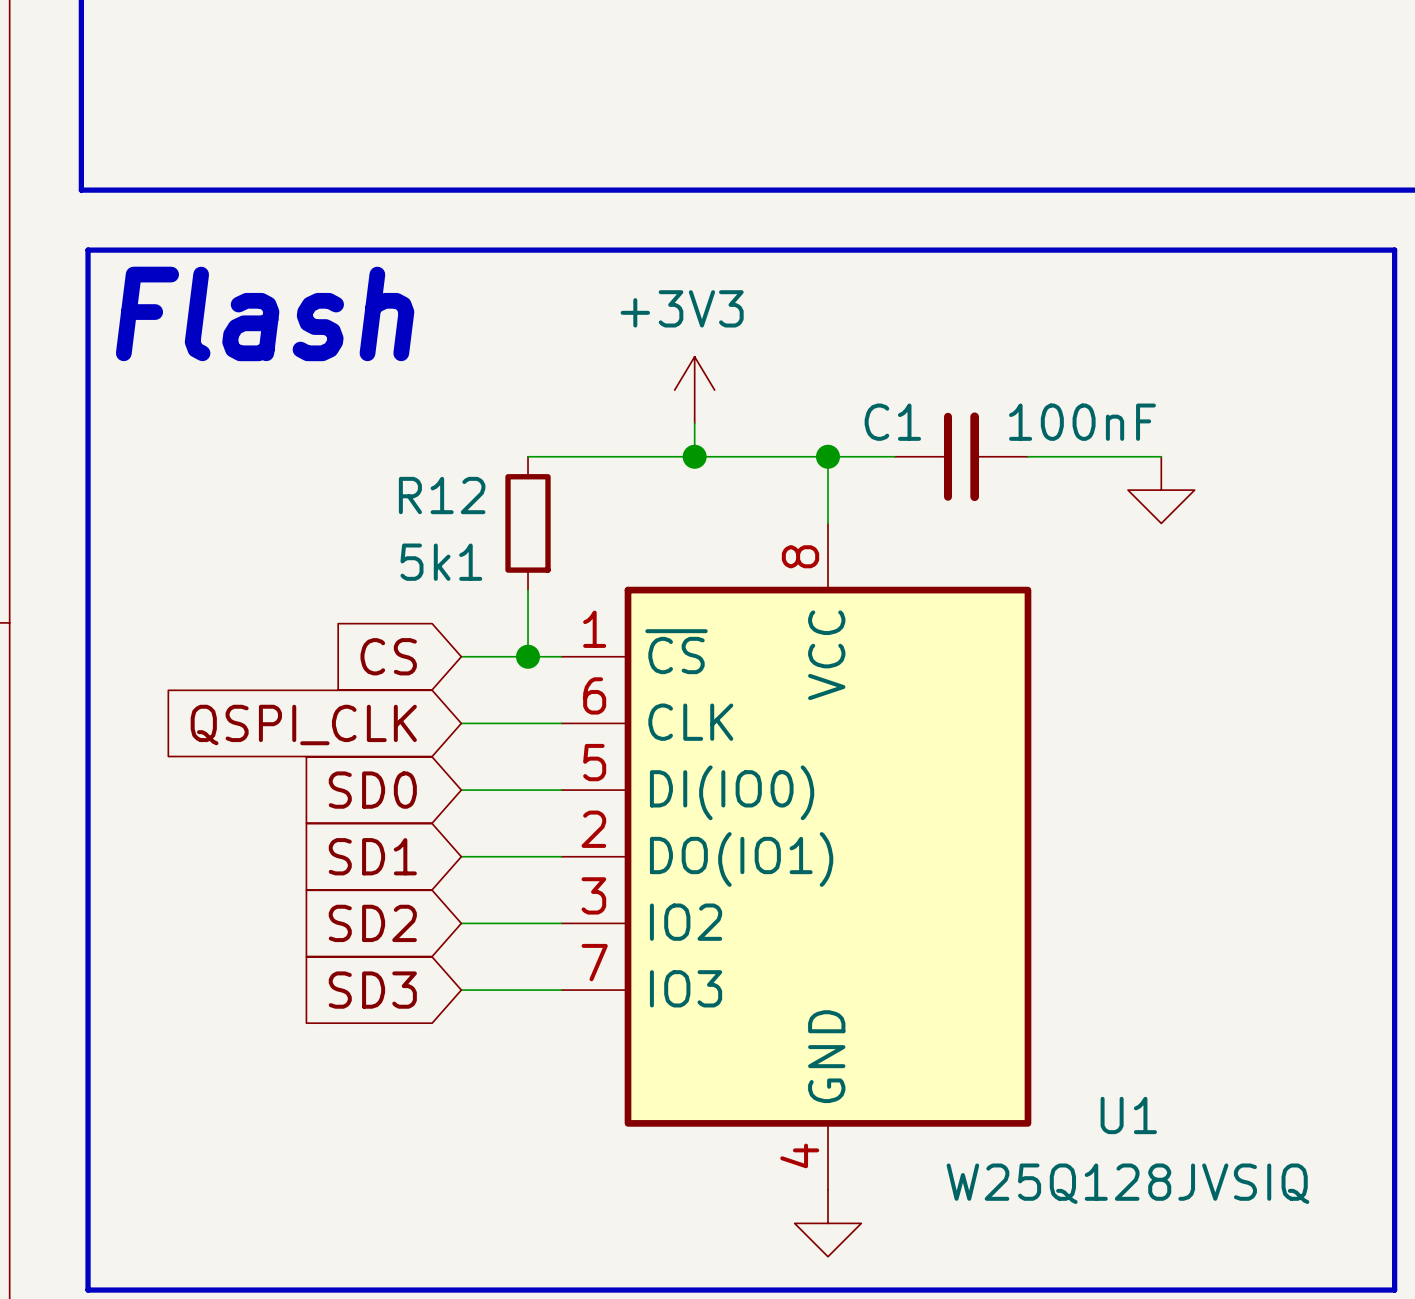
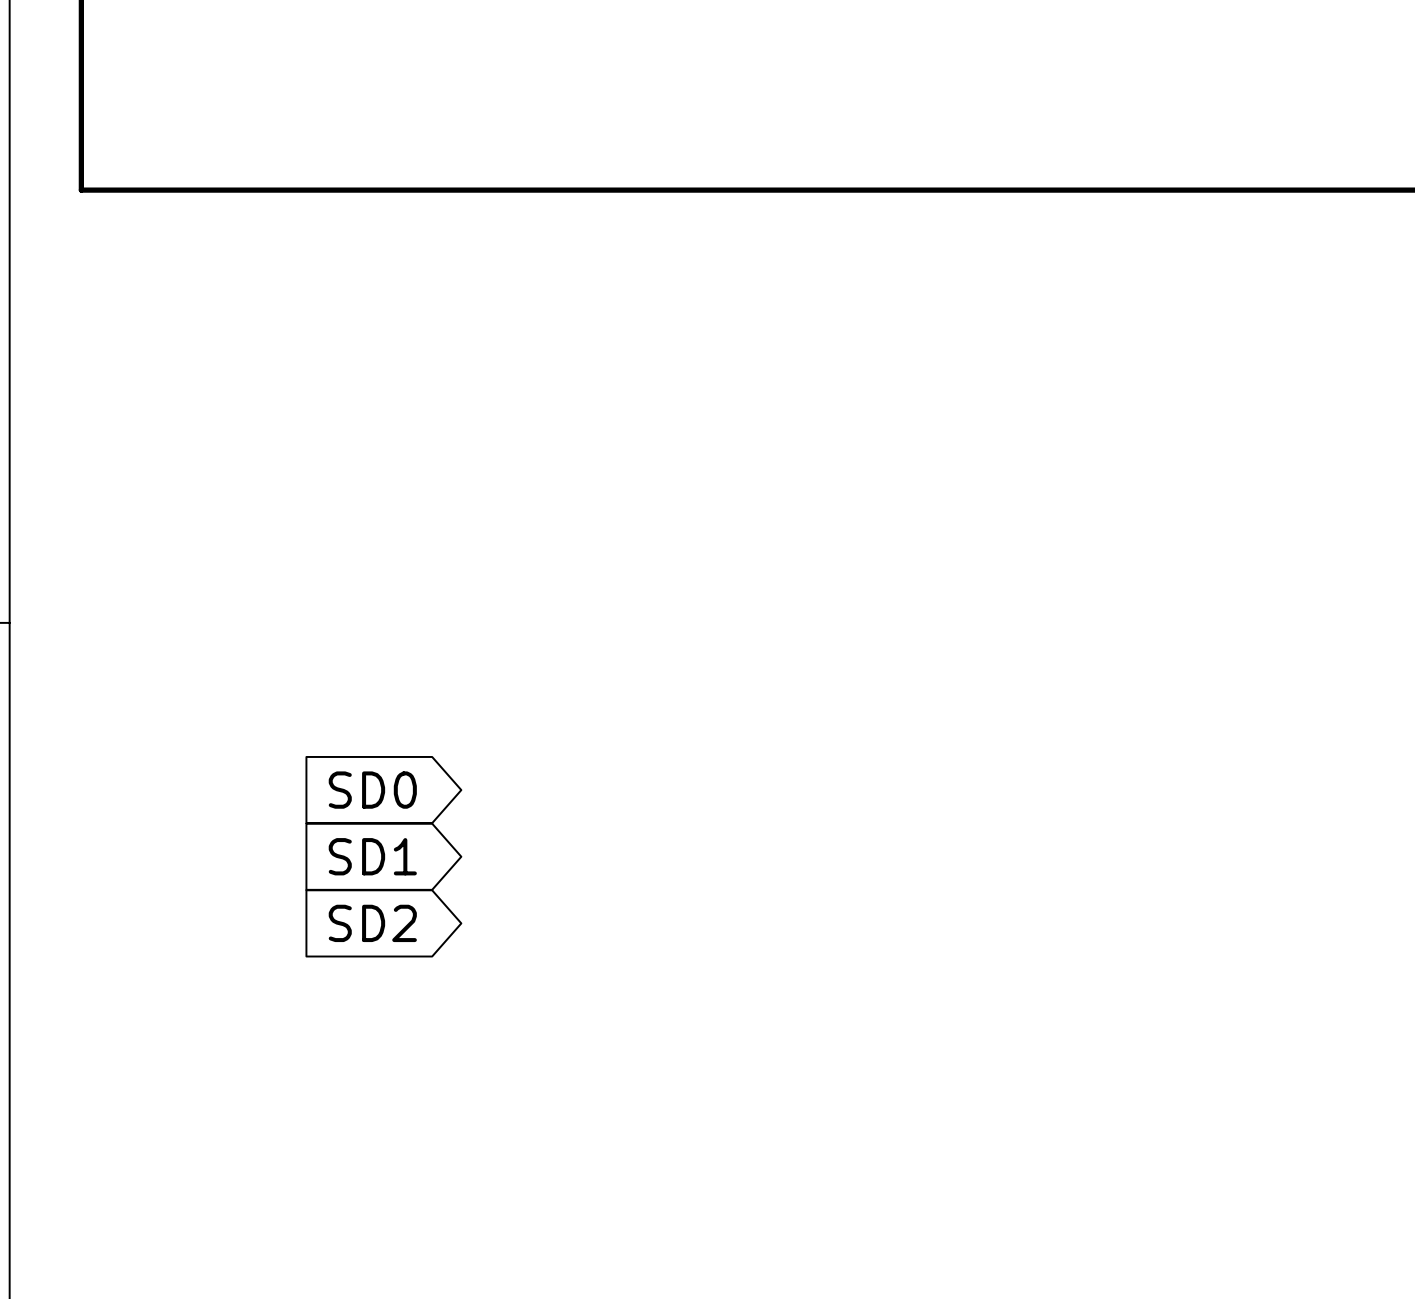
line: (88, 250) (1394, 250) (1394, 1290) (88, 1290) (88, 250) -> none
text: Flash (265, 313) -> none
power symbol: +3V3 (694, 390) -> none
wire: (694, 423) (694, 456) -> none
wire: (528, 456) (894, 456) -> none
junction: (694, 456) -> none
wire: (827, 456) (827, 523) -> none
junction: (827, 456) -> none
C1: 100nF (961, 456) -> none
wire: (1027, 456) (1161, 456) -> none
power symbol: (1161, 490) -> none
R12: 5k1 (528, 523) -> none
wire: (528, 590) (528, 656) -> none
global label: CS (388, 656) -> none
wire: (461, 656) (561, 656) -> none
junction: (528, 656) -> none
wire: (461, 723) (561, 723) -> none
global label: QSPI_CLK (303, 725) -> none
wire: (461, 790) (561, 790) -> none
wire: (461, 856) (561, 856) -> none
U1: W25Q128JVSIQ (796, 856) -> none
wire: (461, 923) (561, 923) -> none
global label: SD3 (372, 990) -> none
wire: (461, 990) (561, 990) -> none
power symbol: (827, 1223) -> none

